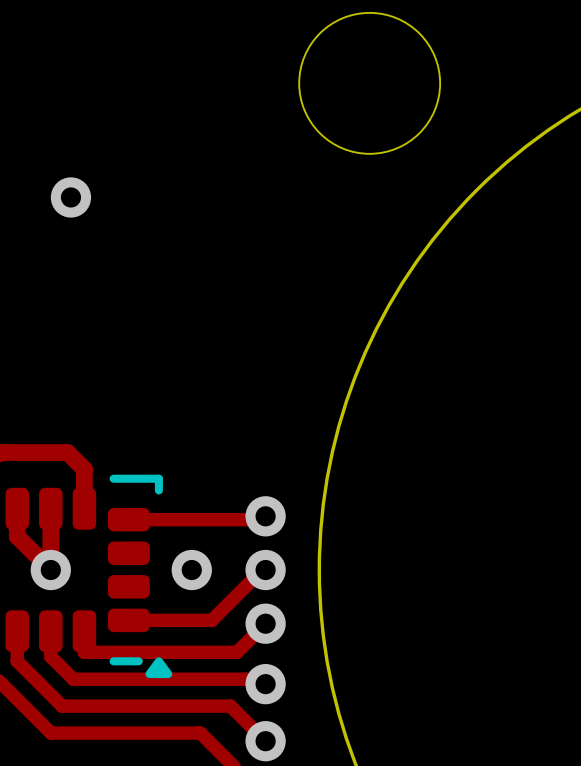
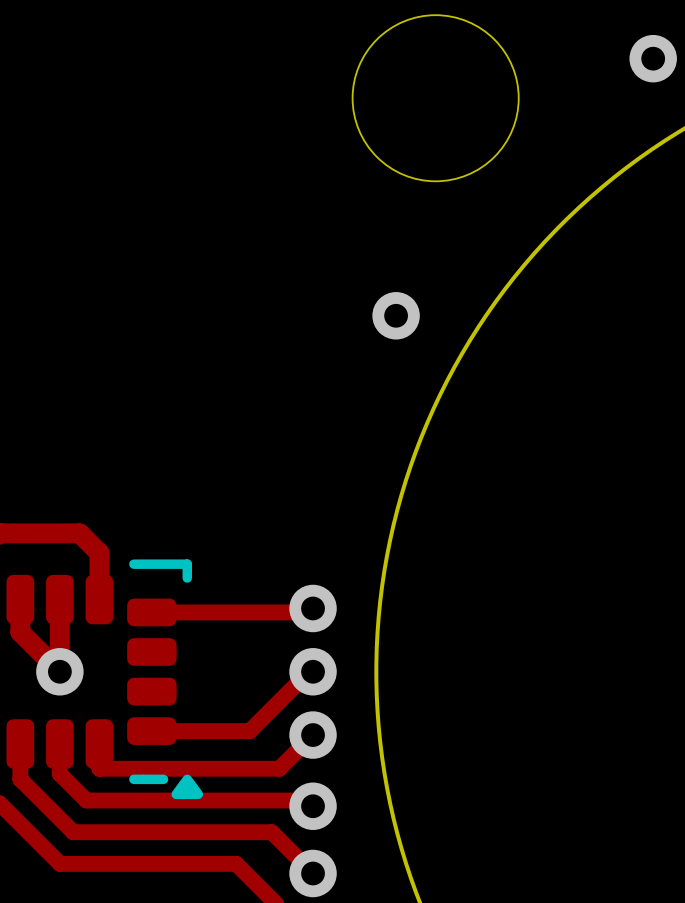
via: none -> (653, 58)
via: (70, 197) -> none
via: none -> (396, 315)
via: (191, 570) -> none

